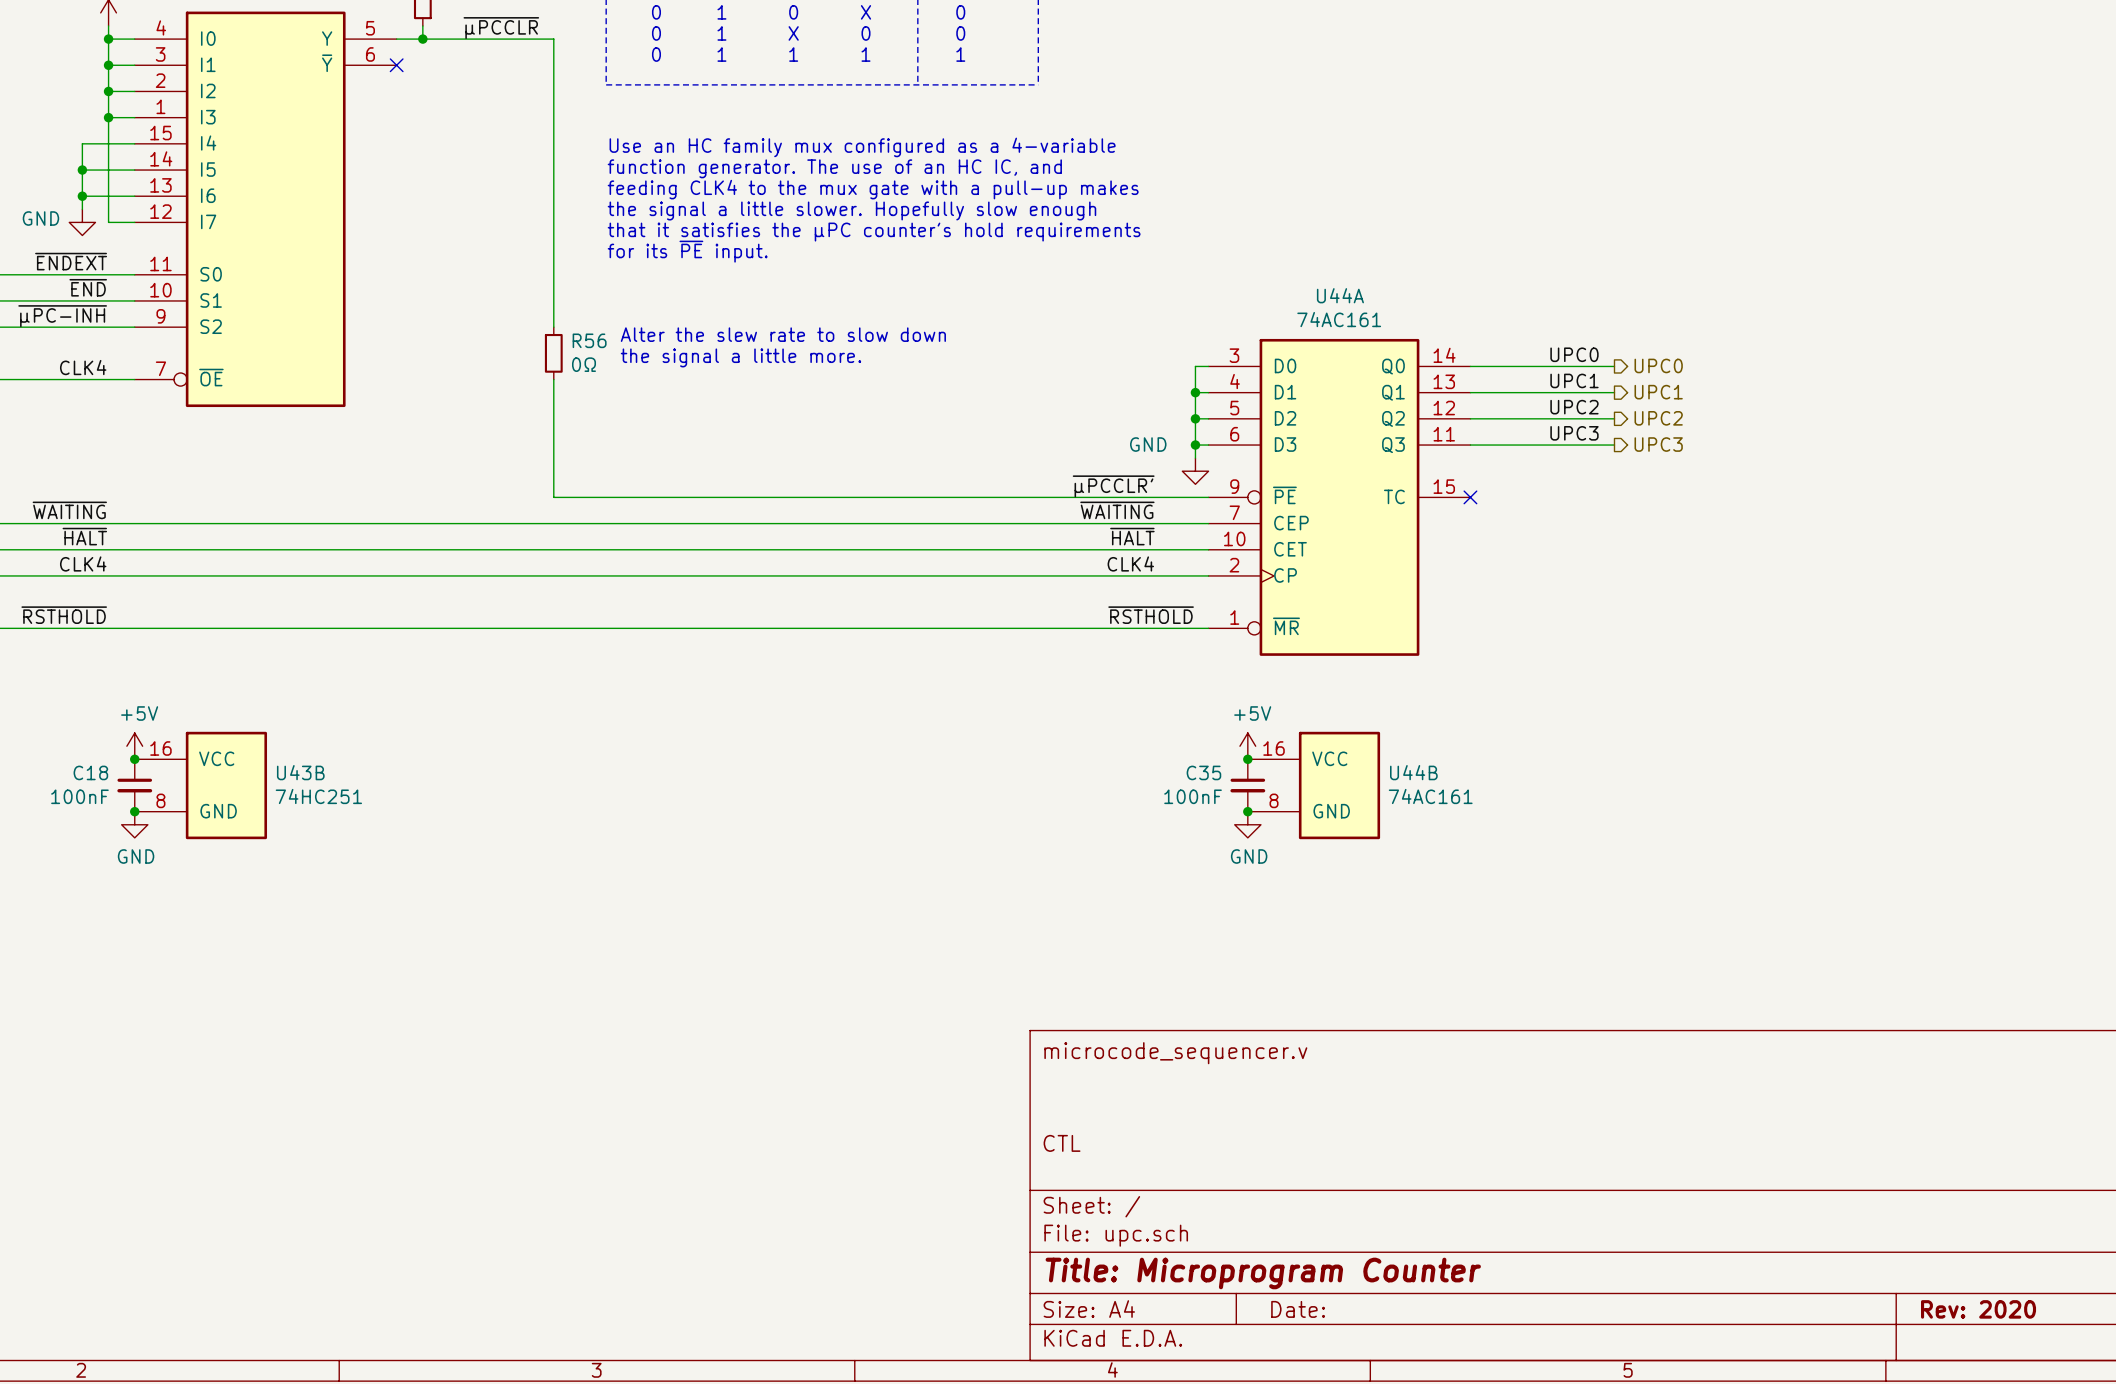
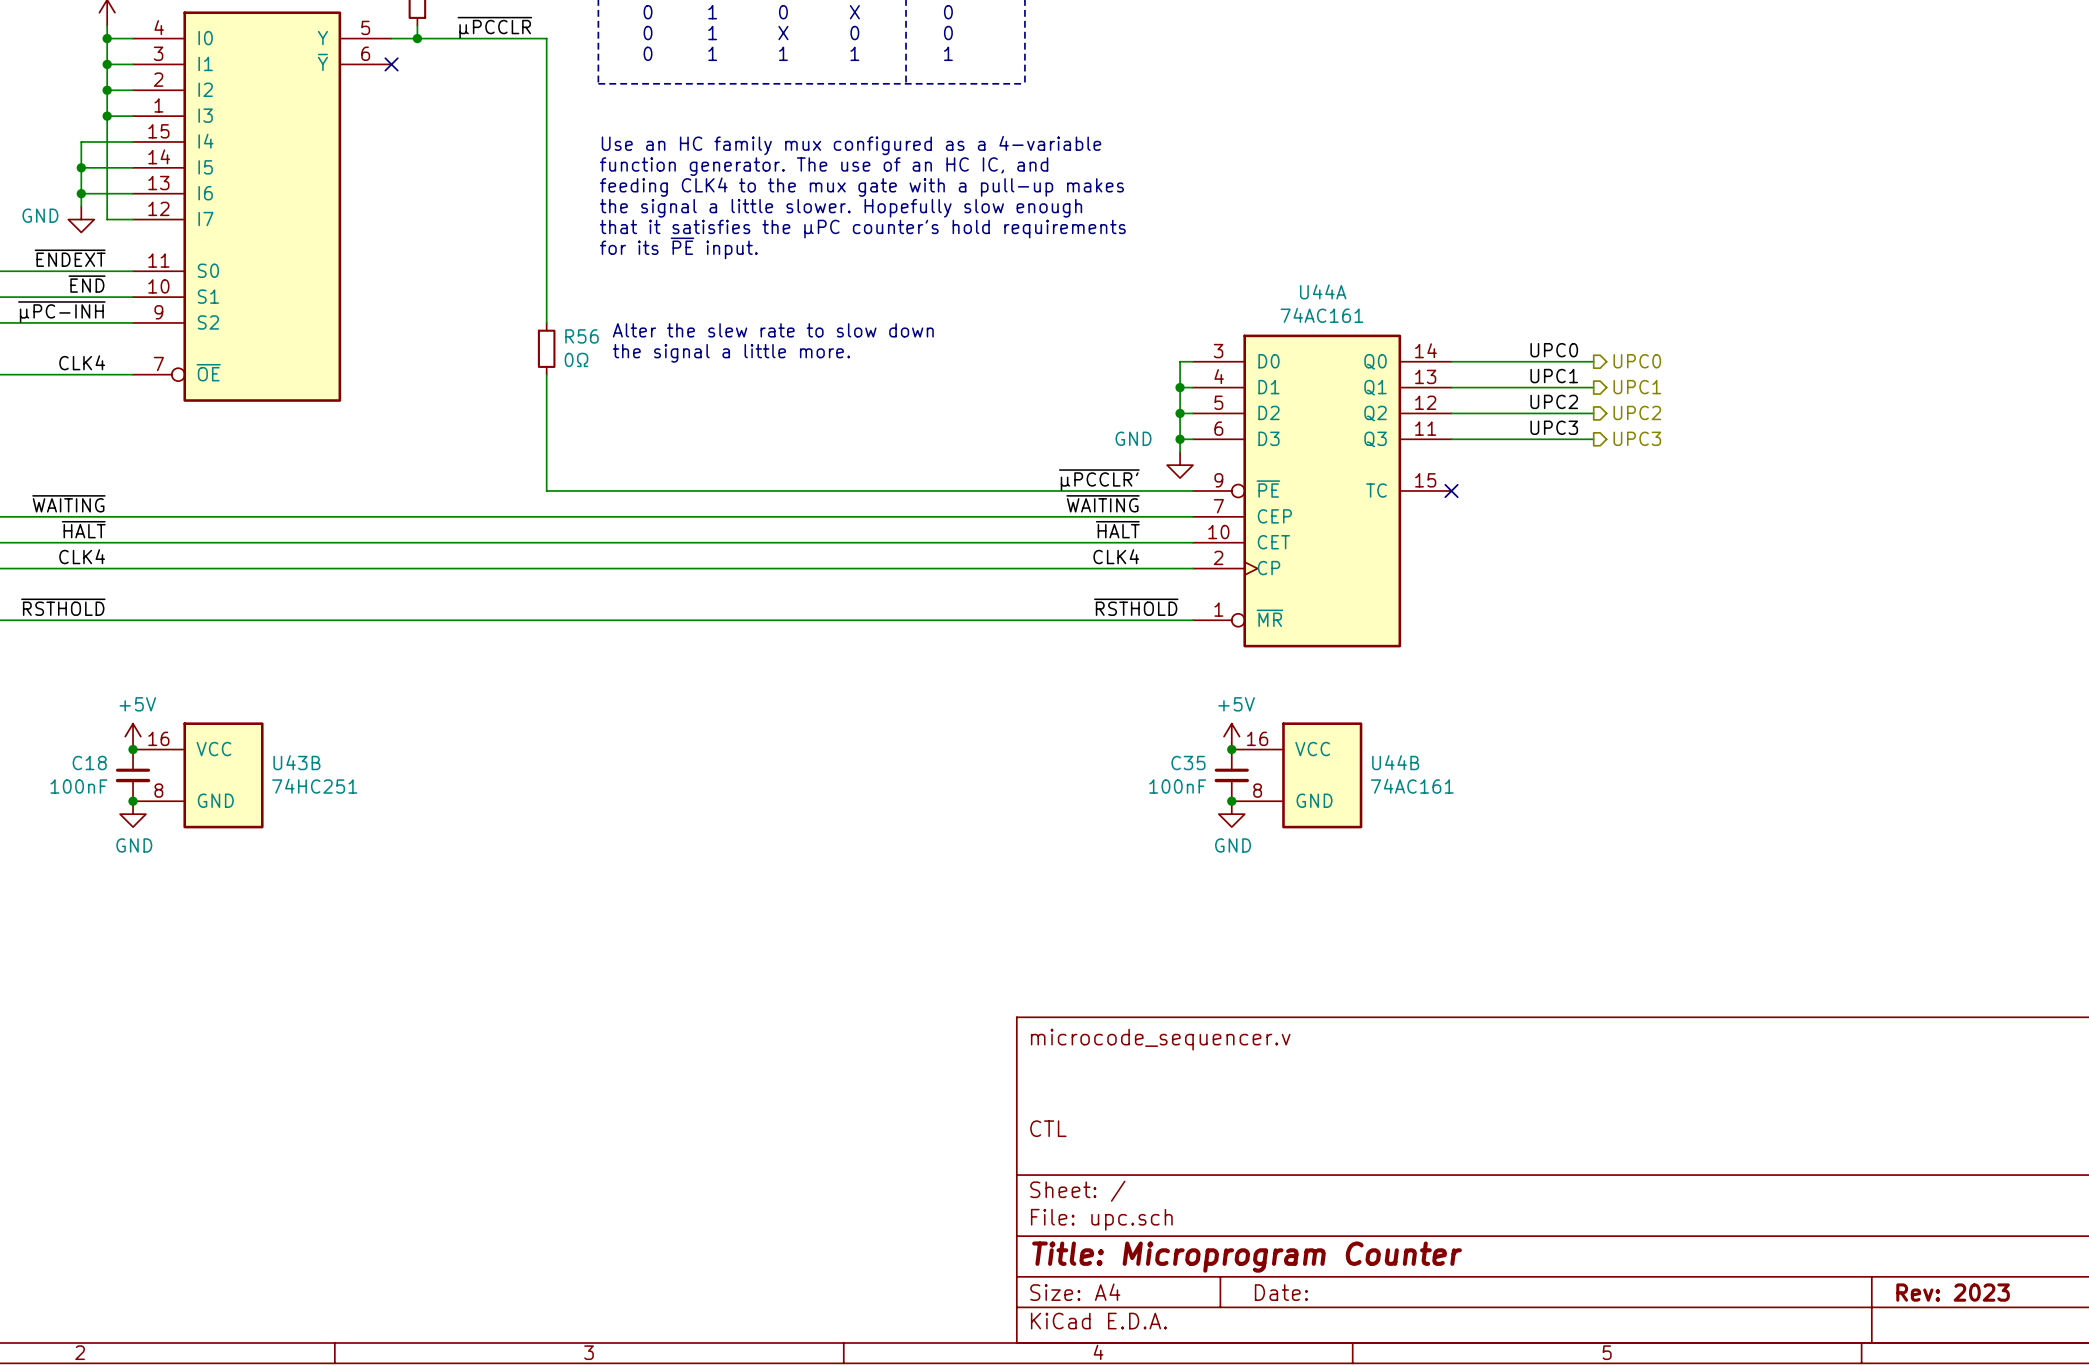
title block: Rev: 2020 (1978, 1309) -> Rev: 2023 (1953, 1292)

